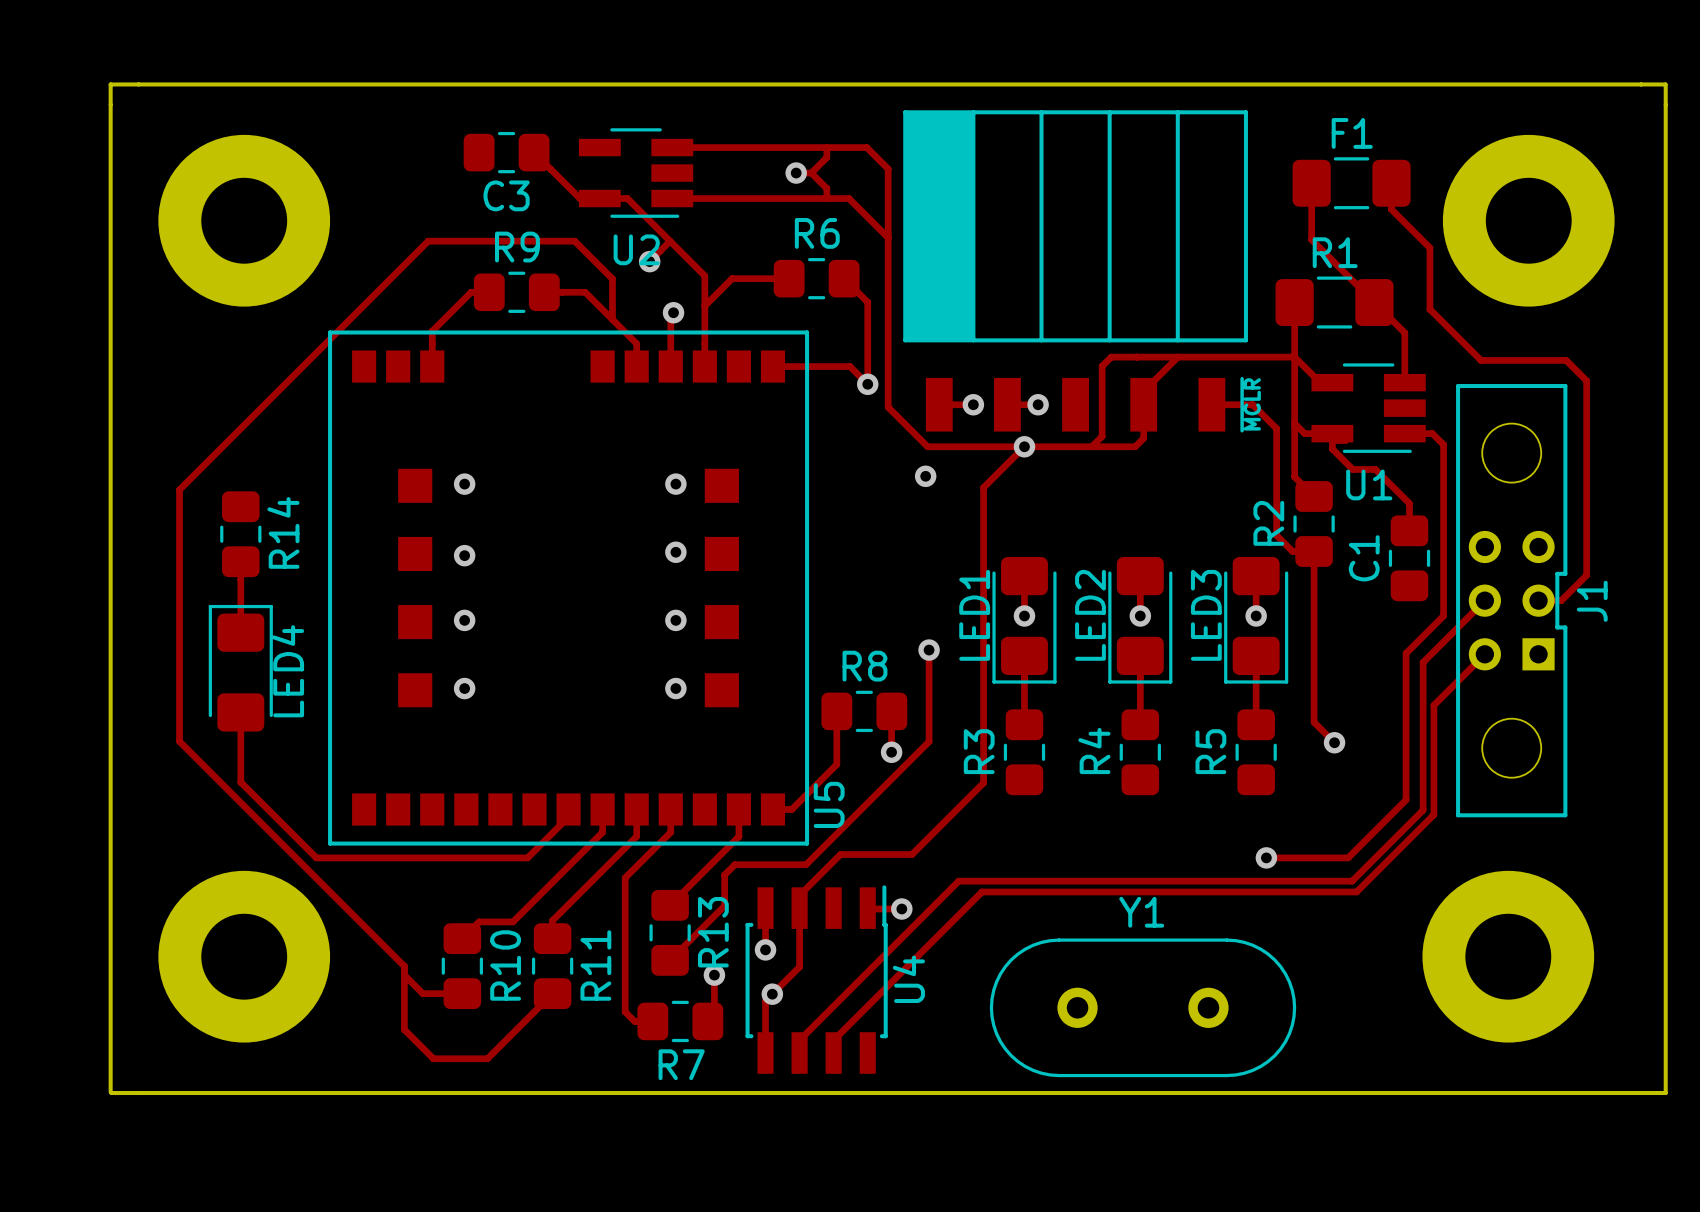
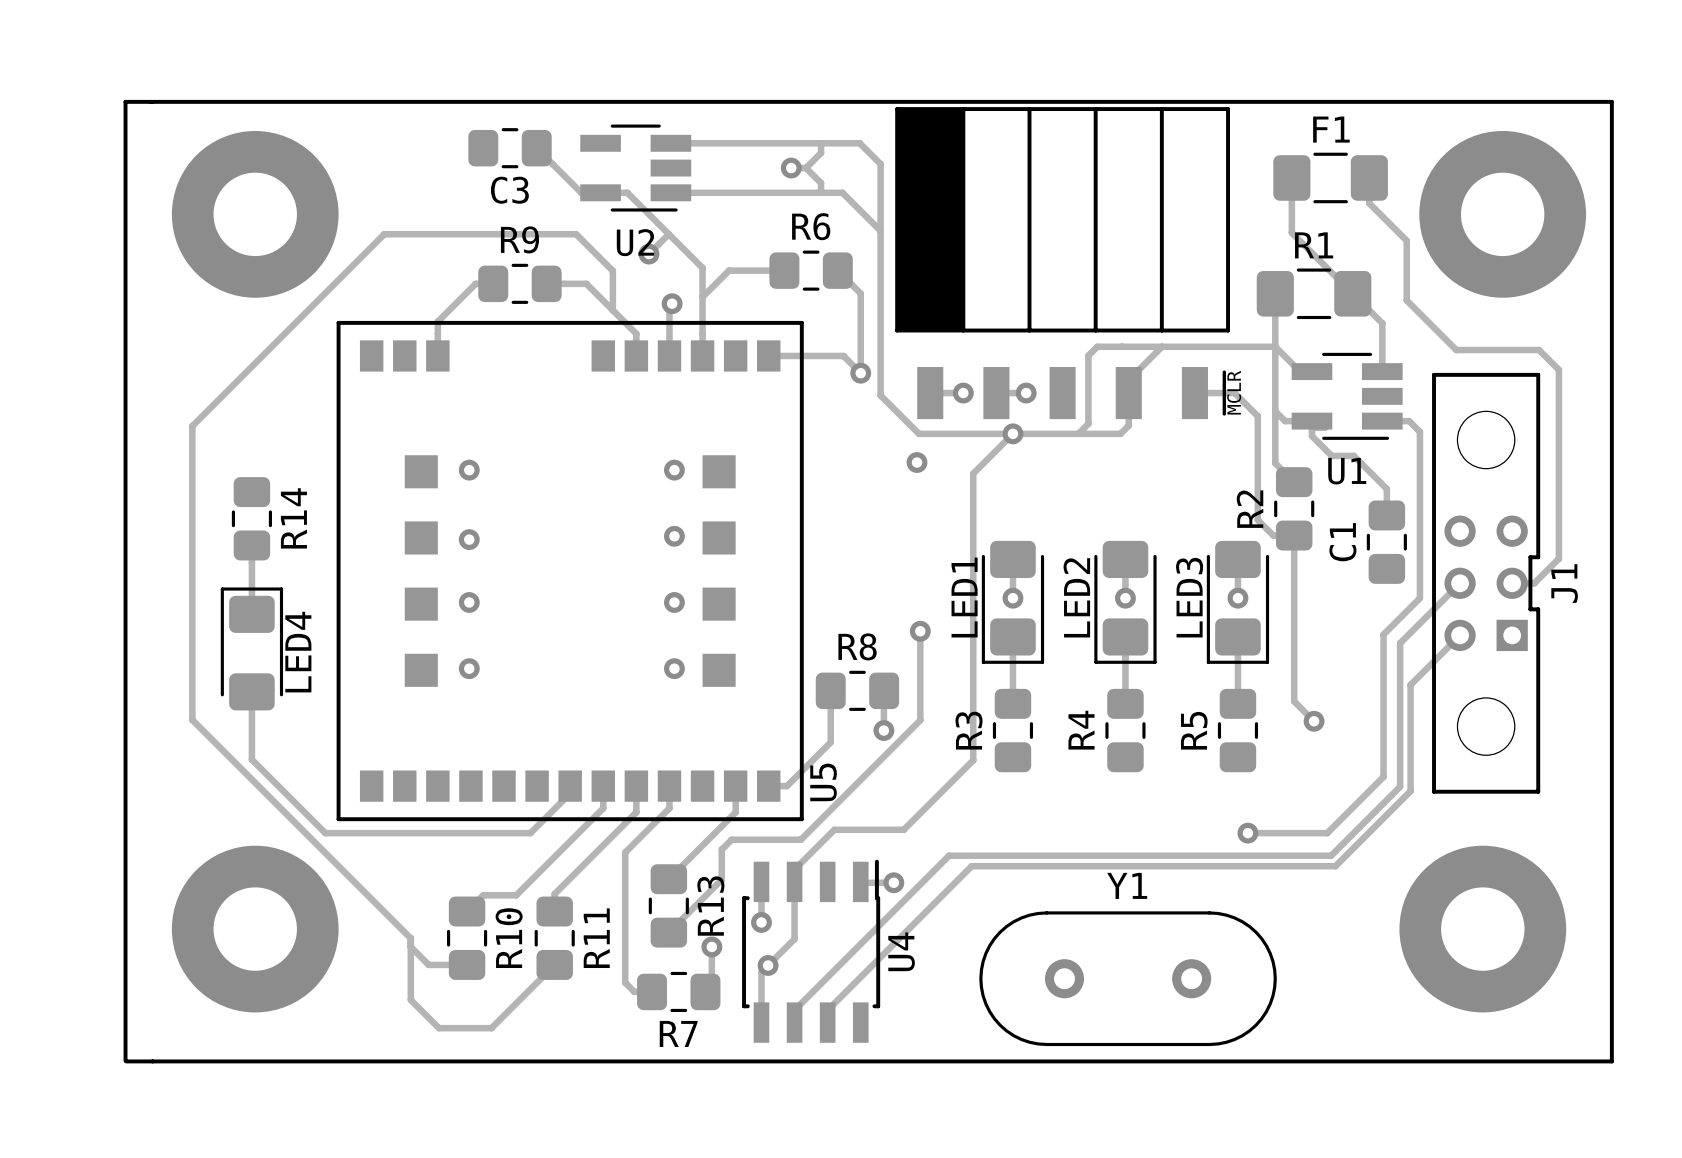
board edge: (1665, 84) (1665, 1093) (1641, 1093) -> (152, 101) (1611, 101) (1611, 1061)
board edge: (1665, 84) (110, 84) (110, 104) -> (151, 101) (125, 101)
track: (428, 241) (179, 489) -> (433, 234) (384, 234) (192, 426) (192, 475)

